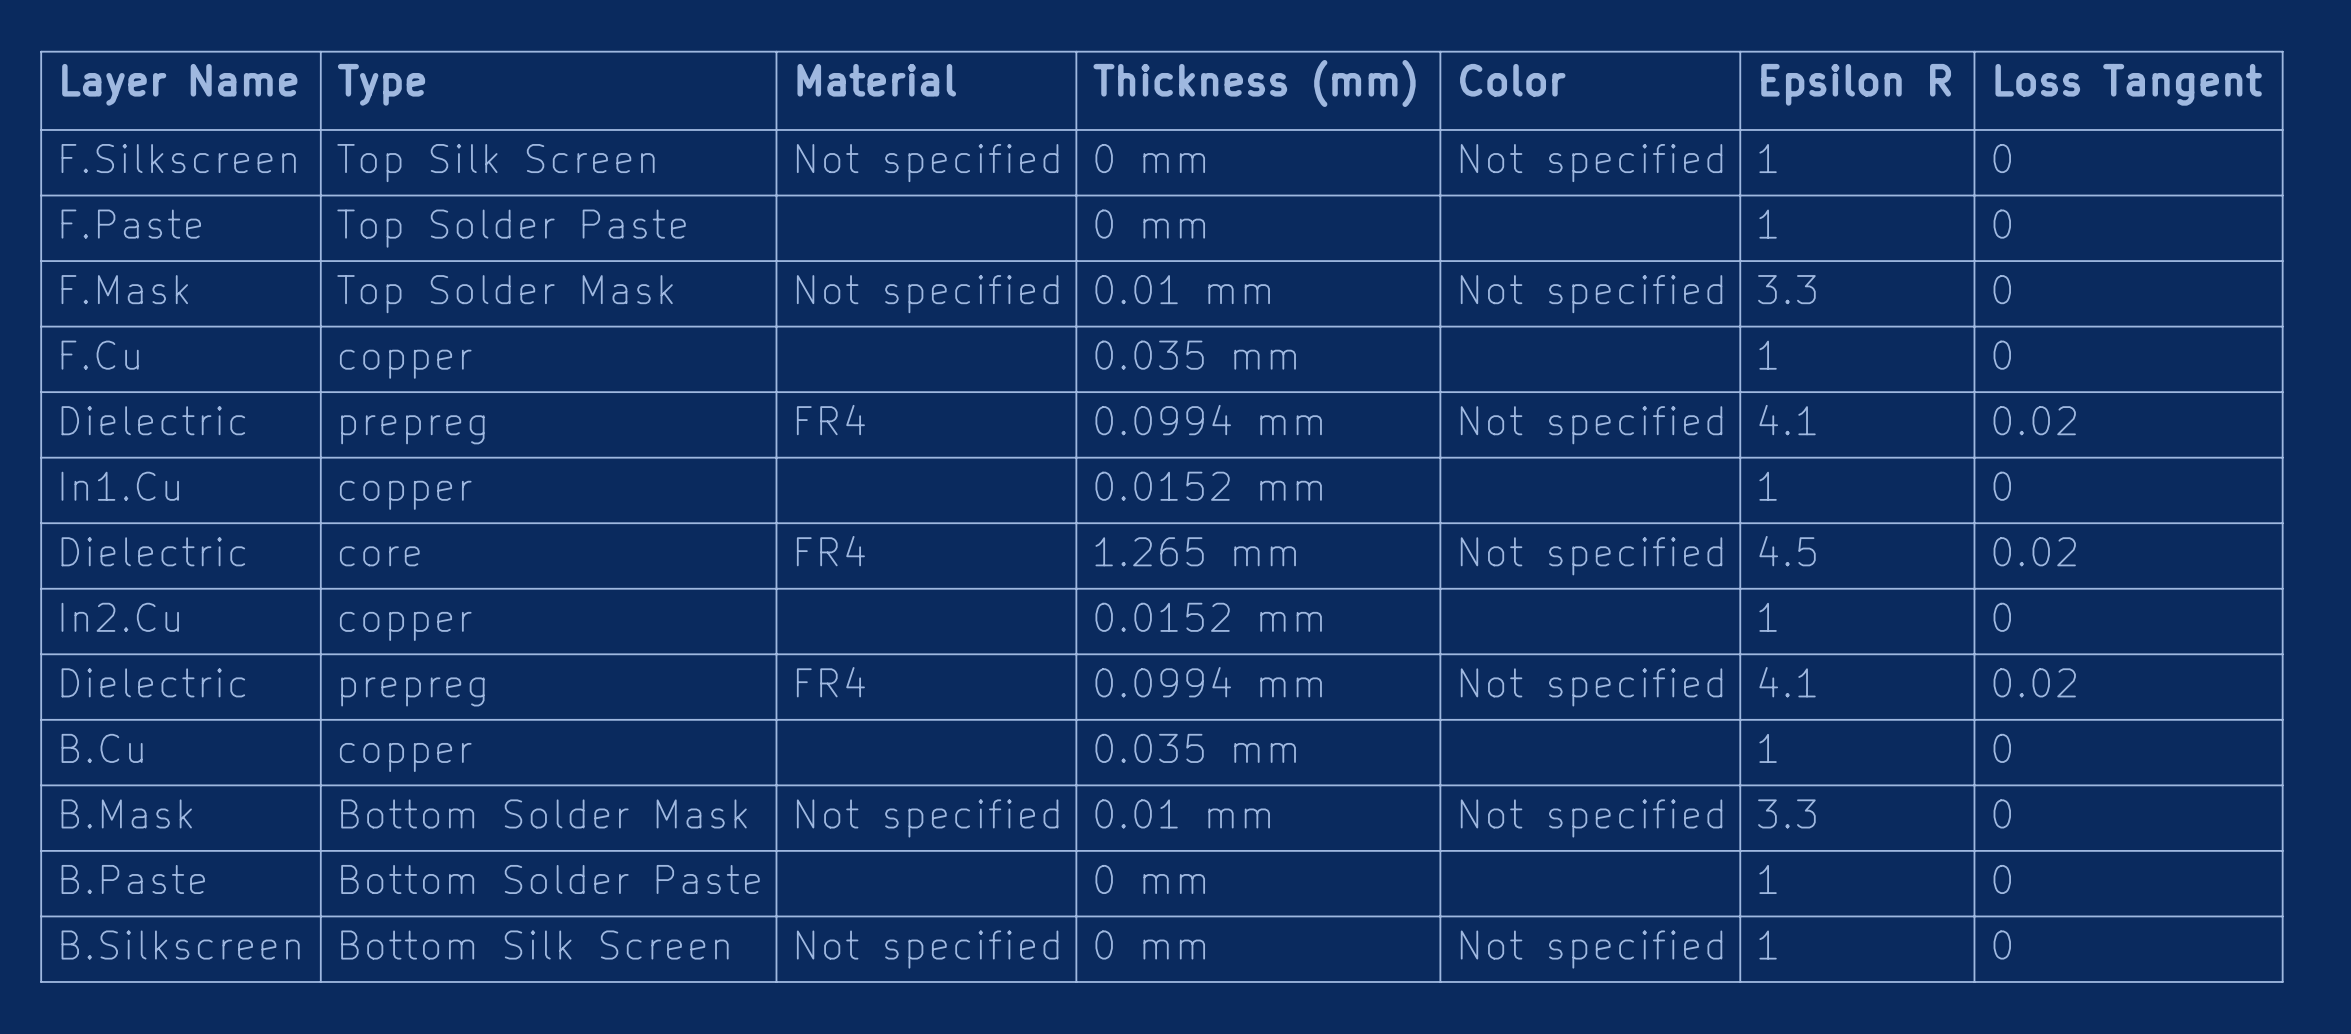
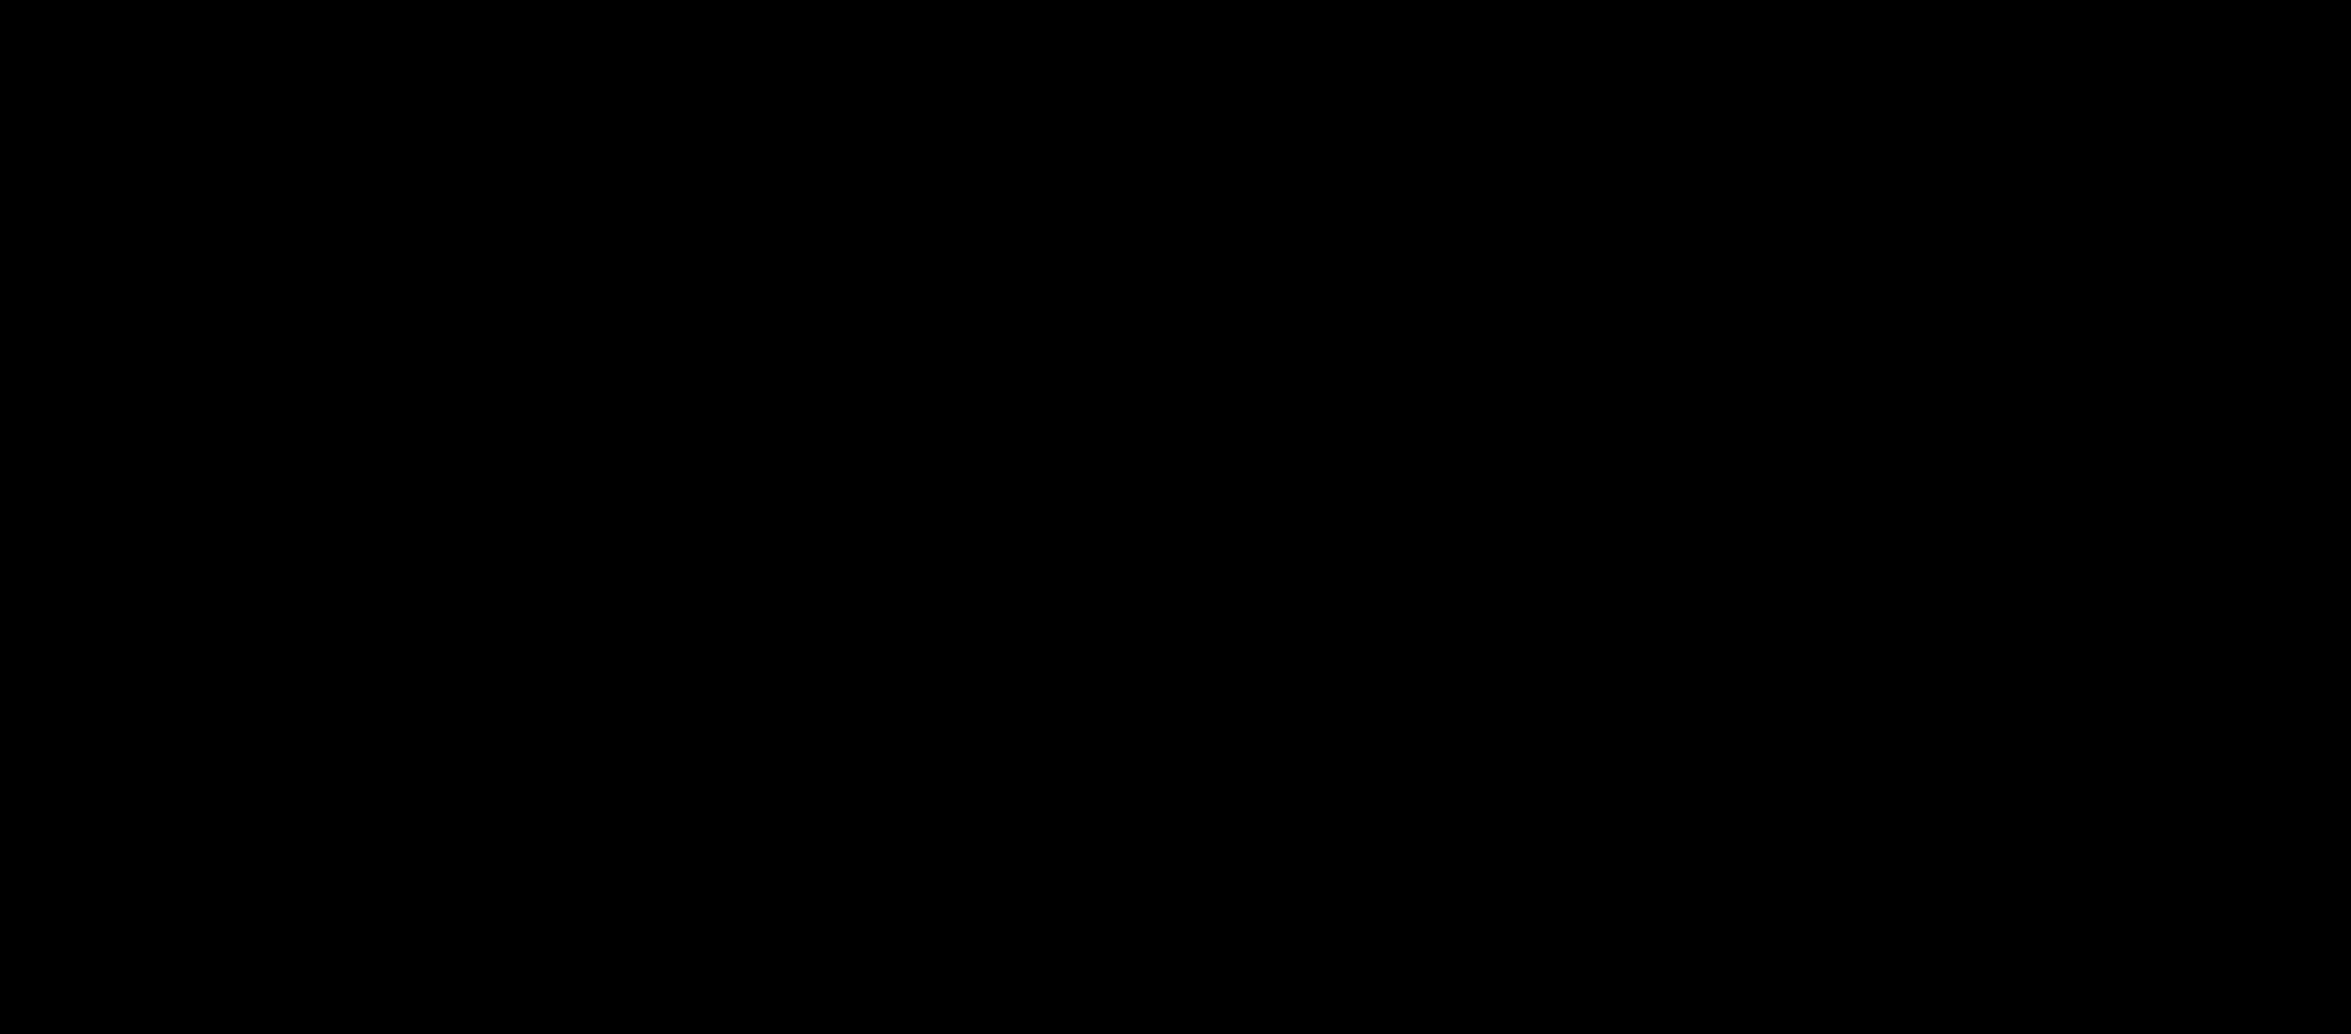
line: (41, 51) (41, 981) (2282, 981) (2282, 51) (41, 51) -> none
line: (320, 51) (320, 981) -> none
line: (776, 51) (776, 981) -> none
line: (1076, 51) (1076, 981) -> none
line: (1440, 51) (1440, 981) -> none
line: (1740, 51) (1740, 981) -> none
line: (1974, 51) (1974, 981) -> none
text: Material (876, 80) -> none
text: Color (1512, 80) -> none
text: Thickness (mm) (1254, 83) -> none
text: Layer Name (179, 84) -> none
text: Type (381, 84) -> none
text: Epsilon R (1856, 84) -> none
text: Loss Tangent (2128, 84) -> none
line: (41, 129) (2282, 129) -> none
text: F.Silkscreen (178, 158) -> none
text: 0 mm (1150, 158) -> none
text: 1 (1768, 158) -> none
text: 0 (2002, 158) -> none
text: Top Silk Screen (495, 163) -> none
text: Not specified (927, 163) -> none
text: Not specified (1591, 163) -> none
line: (41, 195) (2282, 195) -> none
text: F.Paste (131, 224) -> none
text: 0 mm (1150, 224) -> none
text: 1 (1768, 224) -> none
text: 0 (2002, 224) -> none
text: Top Solder Paste (511, 228) -> none
line: (41, 261) (2282, 261) -> none
text: F.Mask (124, 289) -> none
text: 0.01 mm (1182, 289) -> none
text: 3.3 (1786, 289) -> none
text: 0 (2002, 289) -> none
text: Top Solder Mask (505, 294) -> none
text: Not specified (927, 294) -> none
text: Not specified (1591, 294) -> none
line: (41, 326) (2282, 326) -> none
text: F.Cu (100, 355) -> none
text: 0.035 mm (1195, 355) -> none
text: 1 (1768, 355) -> none
text: 0 (2002, 355) -> none
text: copper (405, 364) -> none
line: (41, 392) (2282, 392) -> none
text: Dielectric (153, 420) -> none
text: FR4 (830, 420) -> none
text: 0.0994 mm (1208, 420) -> none
text: 4.1 (1787, 420) -> none
text: 0.02 (2034, 420) -> none
text: Not specified (1591, 425) -> none
text: prepreg (412, 429) -> none
line: (41, 457) (2282, 457) -> none
text: In1.Cu (120, 486) -> none
text: 0.0152 mm (1208, 486) -> none
text: 1 (1768, 486) -> none
text: 0 (2002, 486) -> none
text: copper (405, 495) -> none
line: (41, 523) (2282, 523) -> none
text: Dielectric (153, 551) -> none
text: FR4 (830, 551) -> none
text: 1.265 mm (1195, 551) -> none
text: 4.5 (1787, 551) -> none
text: 0.02 (2034, 551) -> none
text: core (379, 556) -> none
text: Not specified (1591, 556) -> none
line: (41, 588) (2282, 588) -> none
text: In2.Cu (120, 617) -> none
text: 0.0152 mm (1208, 617) -> none
text: 1 (1768, 617) -> none
text: 0 (2002, 617) -> none
text: copper (405, 626) -> none
line: (41, 654) (2282, 654) -> none
text: Dielectric (153, 682) -> none
text: FR4 (830, 682) -> none
text: 0.0994 mm (1208, 682) -> none
text: 4.1 (1787, 682) -> none
text: 0.02 (2034, 682) -> none
text: Not specified (1591, 687) -> none
text: prepreg (412, 691) -> none
line: (41, 719) (2282, 719) -> none
text: B.Cu (102, 748) -> none
text: 0.035 mm (1195, 748) -> none
text: 1 (1768, 748) -> none
text: 0 (2002, 748) -> none
text: copper (405, 757) -> none
line: (41, 785) (2282, 785) -> none
text: B.Mask (126, 813) -> none
text: Bottom Solder Mask (543, 813) -> none
text: 0.01 mm (1182, 813) -> none
text: 3.3 (1786, 813) -> none
text: 0 (2002, 813) -> none
text: Not specified (927, 818) -> none
text: Not specified (1591, 818) -> none
line: (41, 850) (2282, 850) -> none
text: B.Paste (133, 879) -> none
text: Bottom Solder Paste (550, 879) -> none
text: 0 mm (1150, 879) -> none
text: 1 (1768, 879) -> none
text: 0 (2002, 879) -> none
line: (41, 916) (2282, 916) -> none
text: B.Silkscreen (180, 945) -> none
text: Bottom Silk Screen (534, 945) -> none
text: 0 mm (1150, 945) -> none
text: 1 (1768, 945) -> none
text: 0 (2002, 945) -> none
text: Not specified (927, 949) -> none
text: Not specified (1591, 949) -> none

